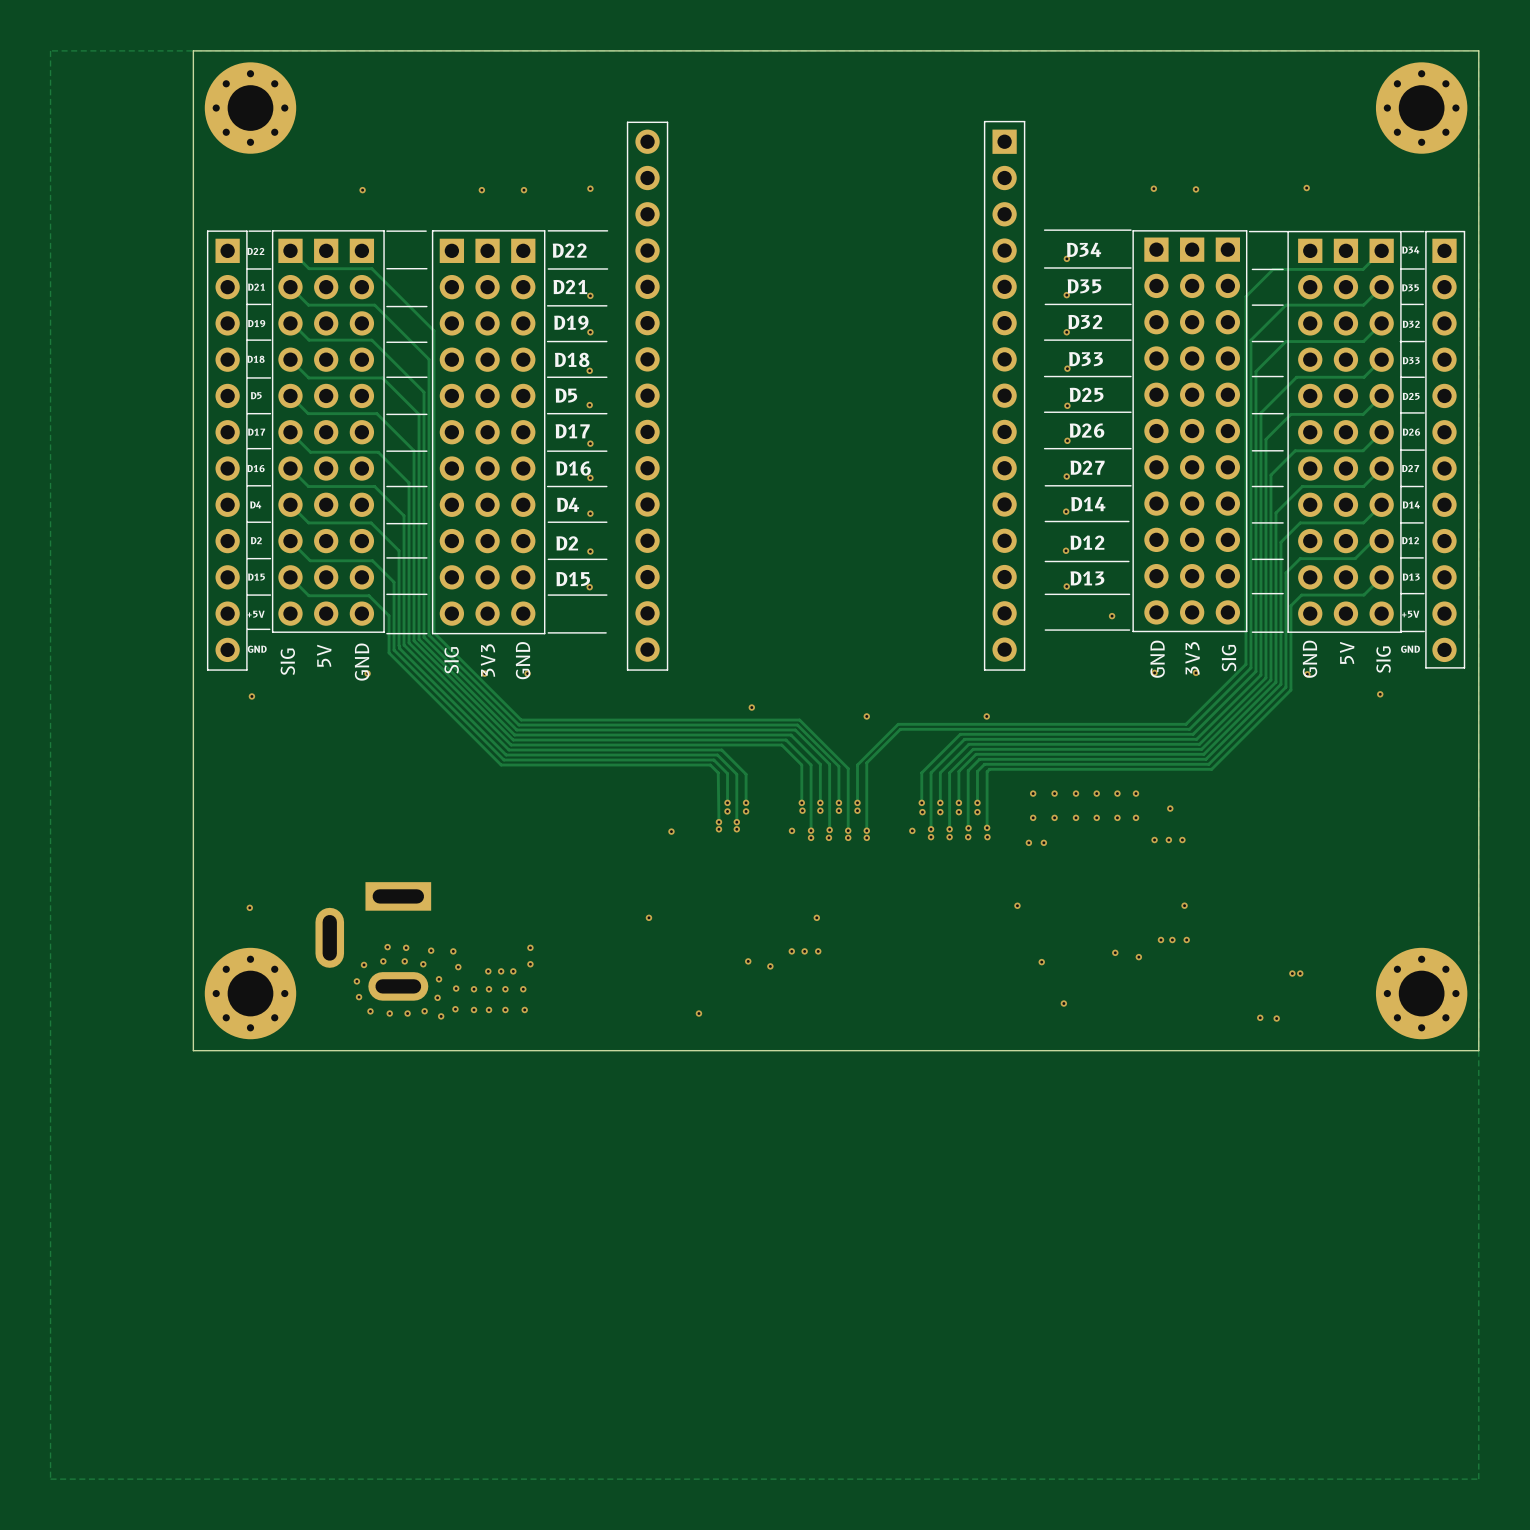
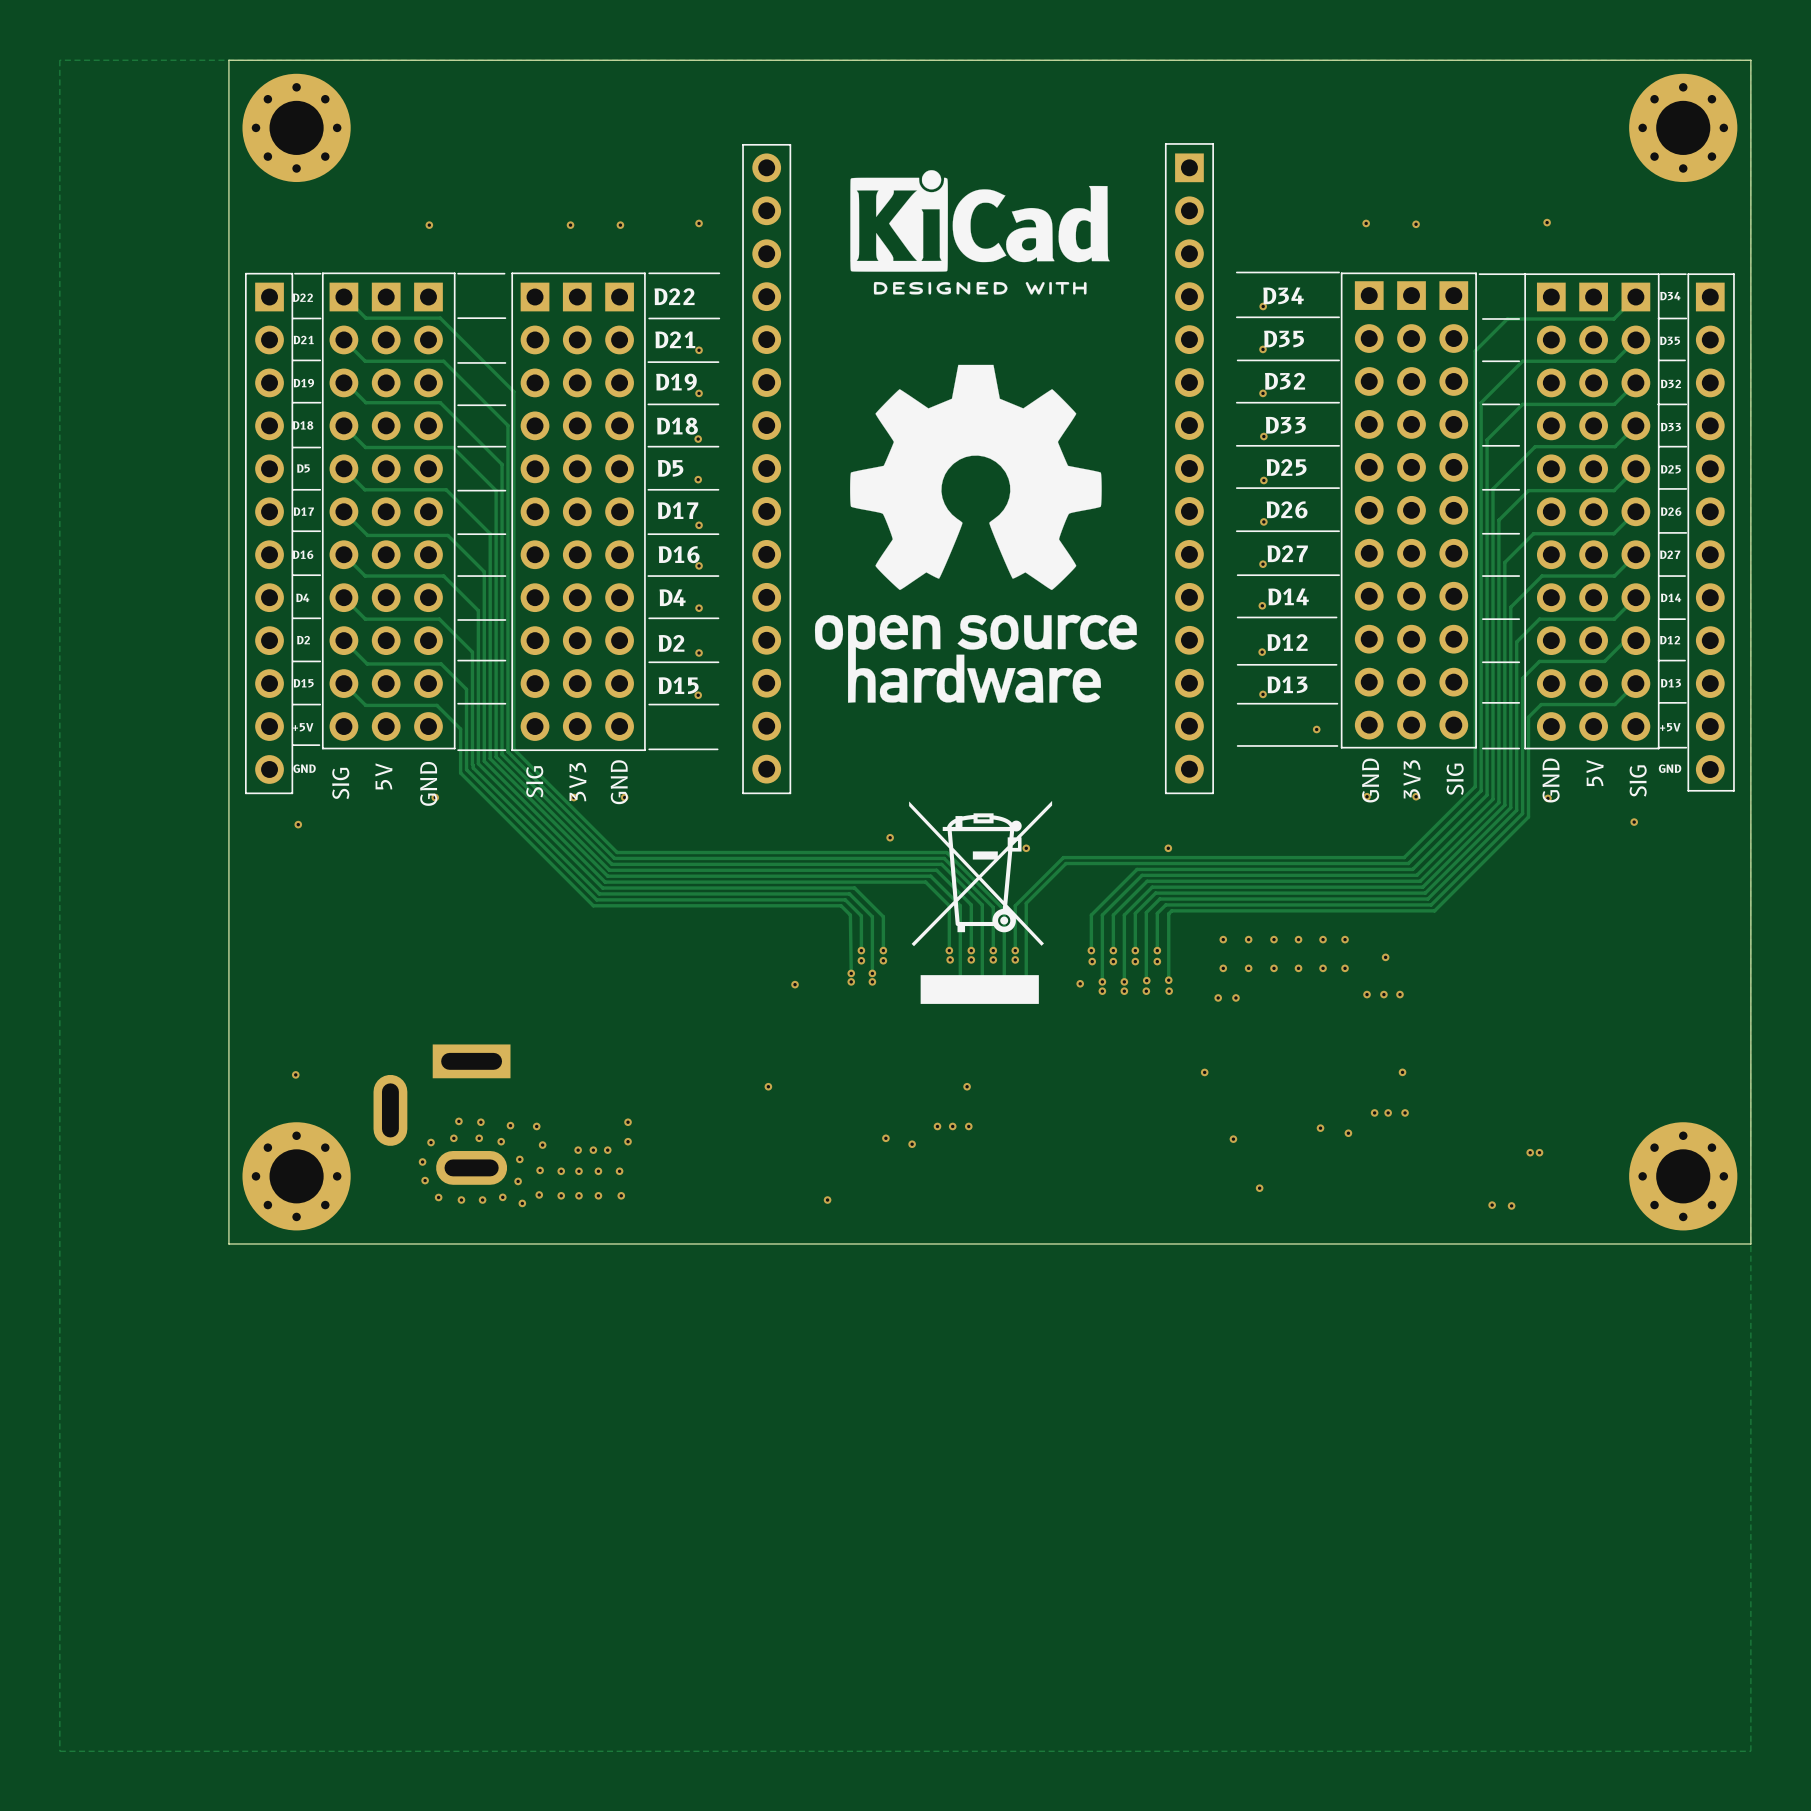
drawing: none -> [850, 170, 1110, 295]
drawing: none -> [814, 364, 1137, 703]
drawing: none -> [909, 800, 1053, 1004]

